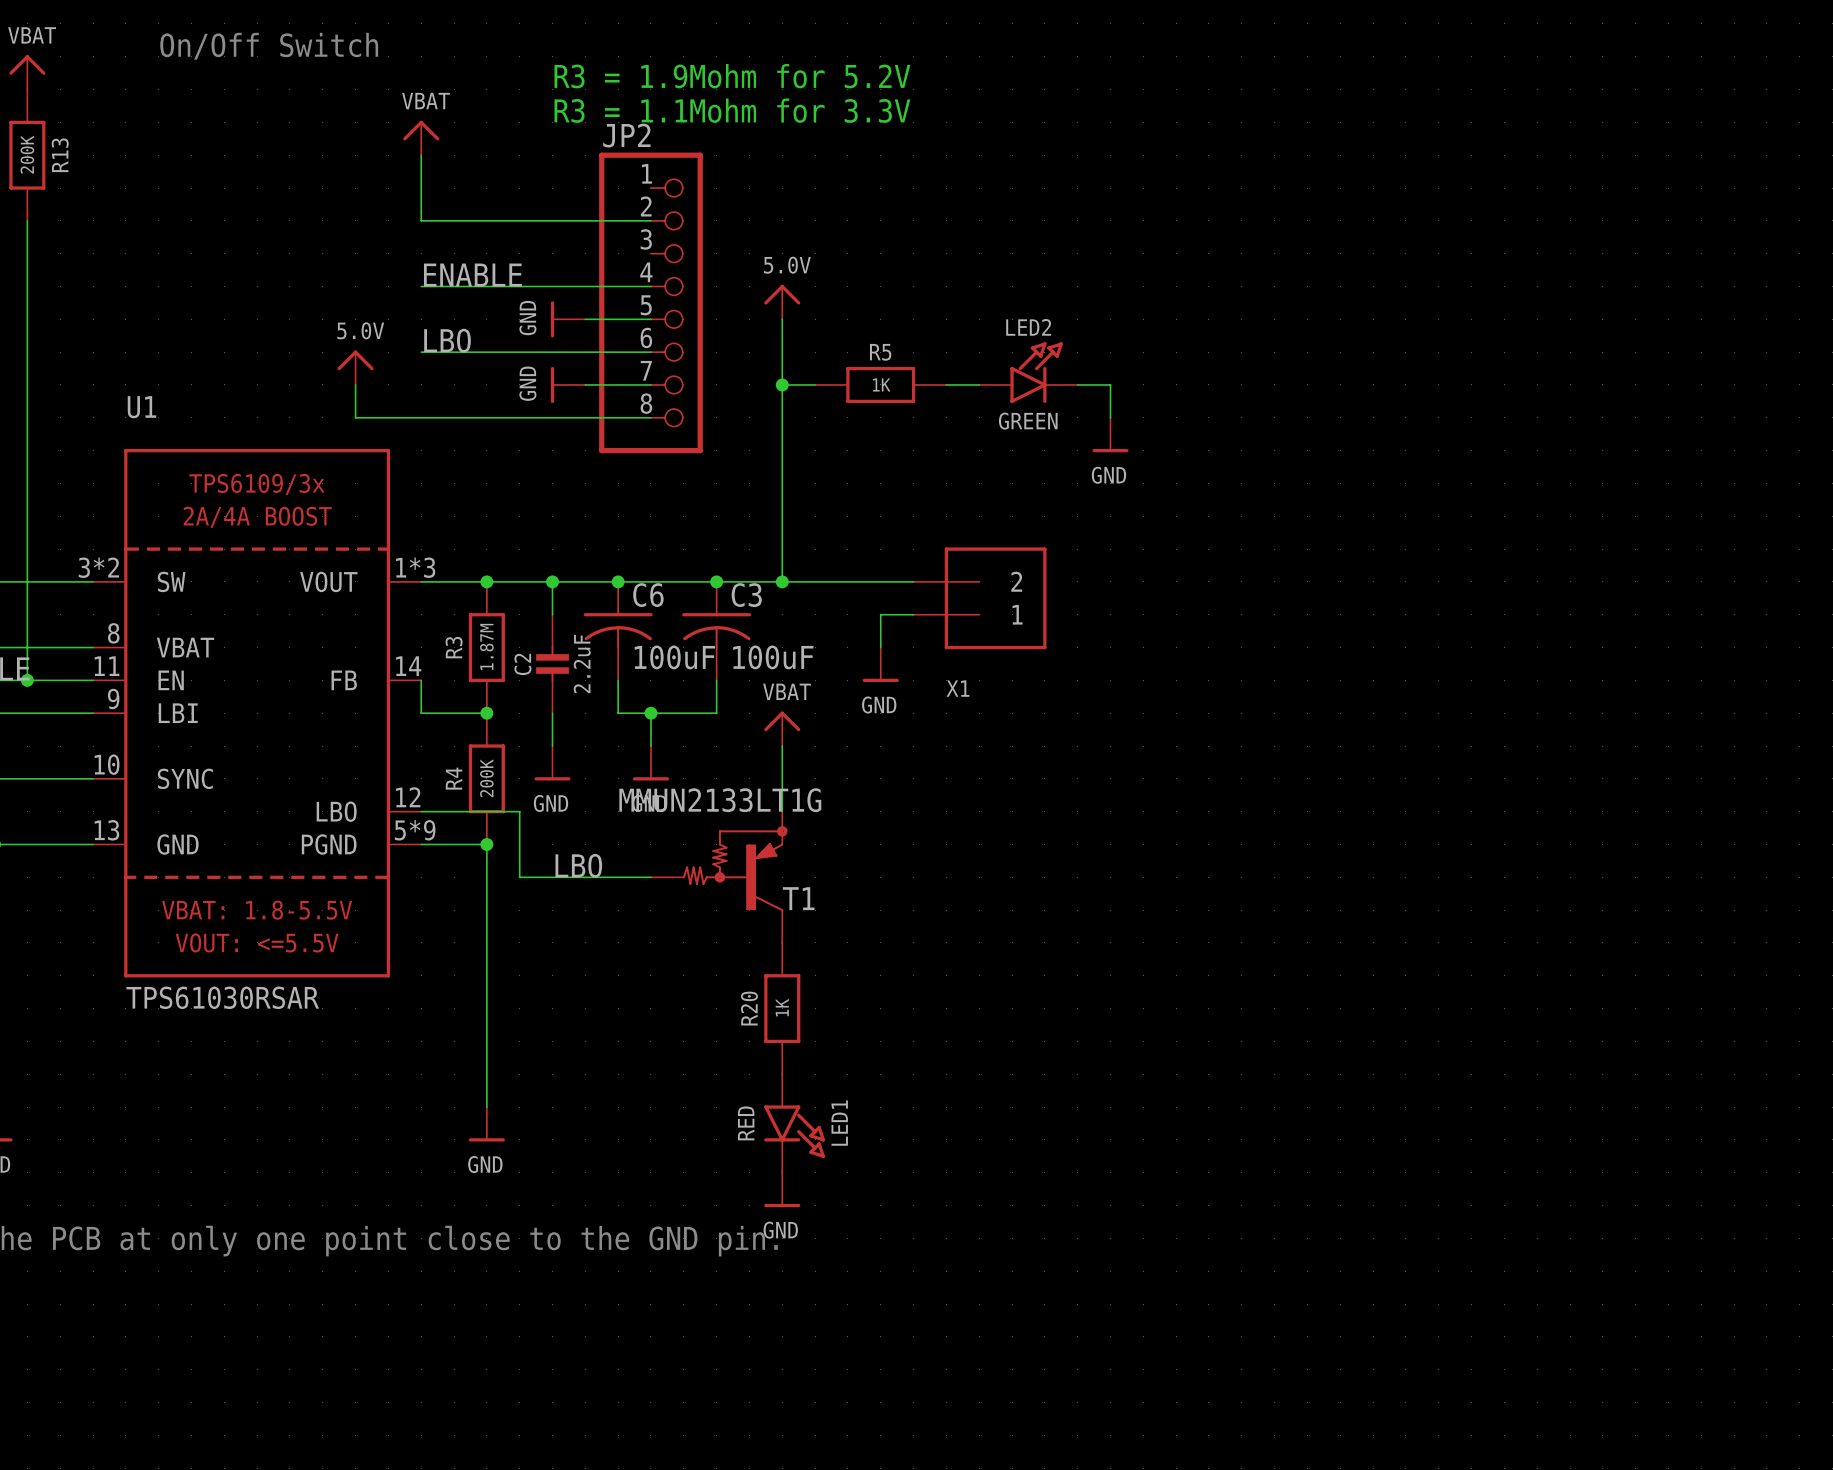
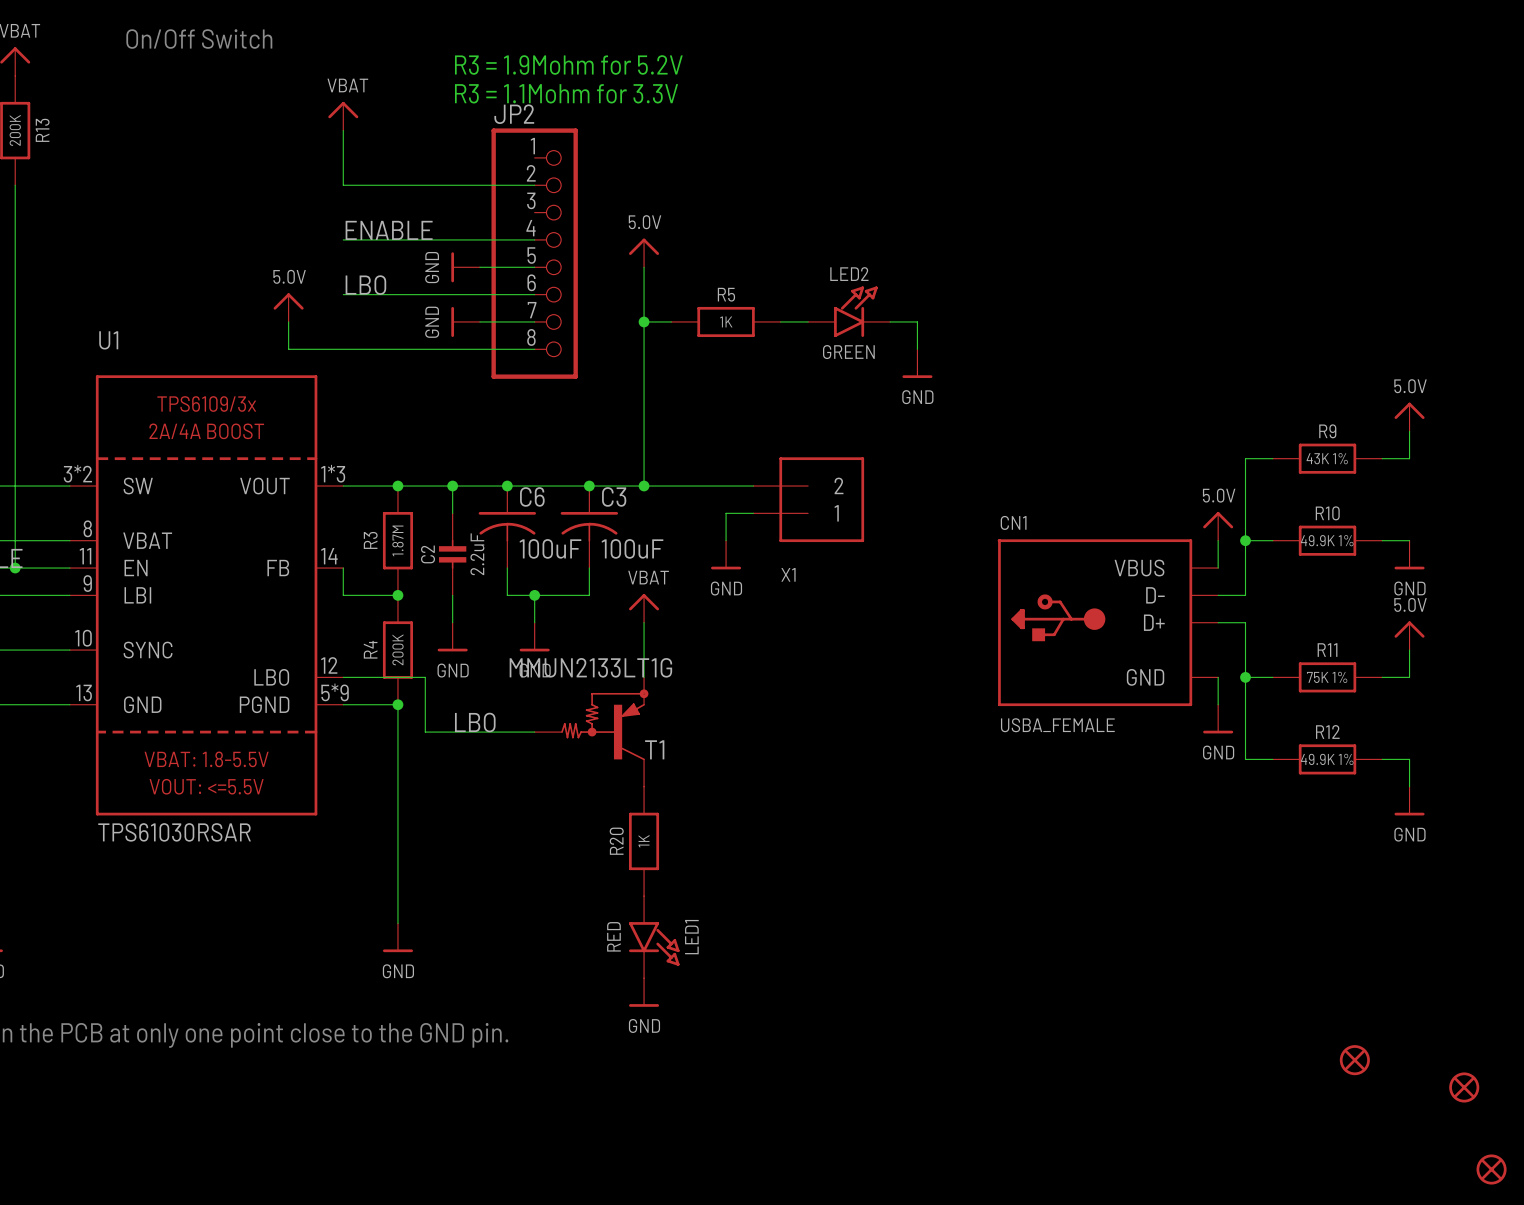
power symbol: none -> 5.0V (1409, 416)
wire: none -> (1409, 431) (1409, 458) (1382, 458)
wire: none -> (1272, 458) (1245, 458) (1245, 595) (1218, 595)
R9: none -> 43K 1% (1327, 458)
power symbol: none -> 5.0V (1218, 526)
wire: none -> (1218, 540) (1218, 568)
wire: none -> (1245, 540) (1272, 540)
junction: none -> (1245, 540)
R10: none -> 49.9K 1% (1327, 540)
wire: none -> (1382, 540) (1409, 540)
power symbol: none -> GND (1409, 555)
CN1: none -> USBA_FEMALE (1107, 622)
wire: none -> (1218, 622) (1245, 622) (1245, 759) (1272, 759)
power symbol: none -> 5.0V (1409, 635)
wire: none -> (1409, 650) (1409, 677) (1382, 677)
wire: none -> (1218, 677) (1218, 704)
wire: none -> (1245, 677) (1272, 677)
junction: none -> (1245, 677)
R11: none -> 75K 1% (1327, 677)
power symbol: none -> GND (1218, 719)
R12: none -> 49.9K 1% (1327, 759)
wire: none -> (1382, 759) (1409, 759) (1409, 786)
power symbol: none -> GND (1409, 801)
part: none -> (1354, 1060)
part: none -> (1464, 1087)
part: none -> (1491, 1169)

